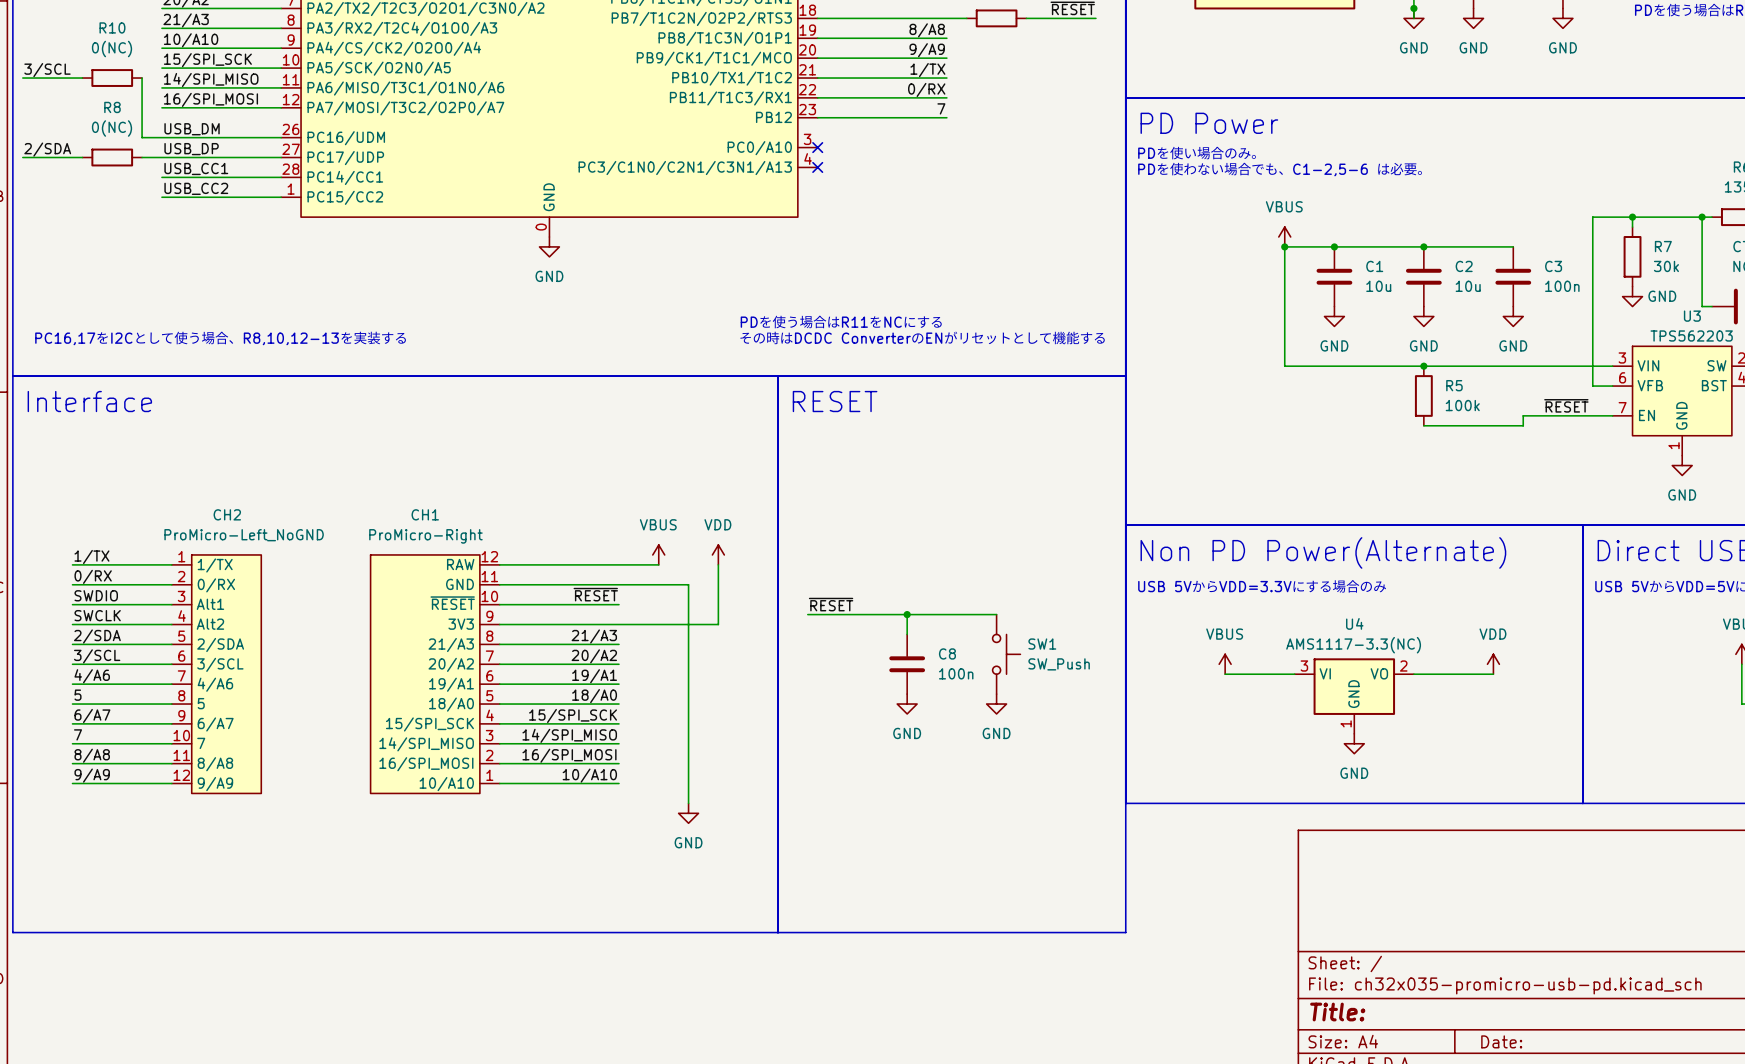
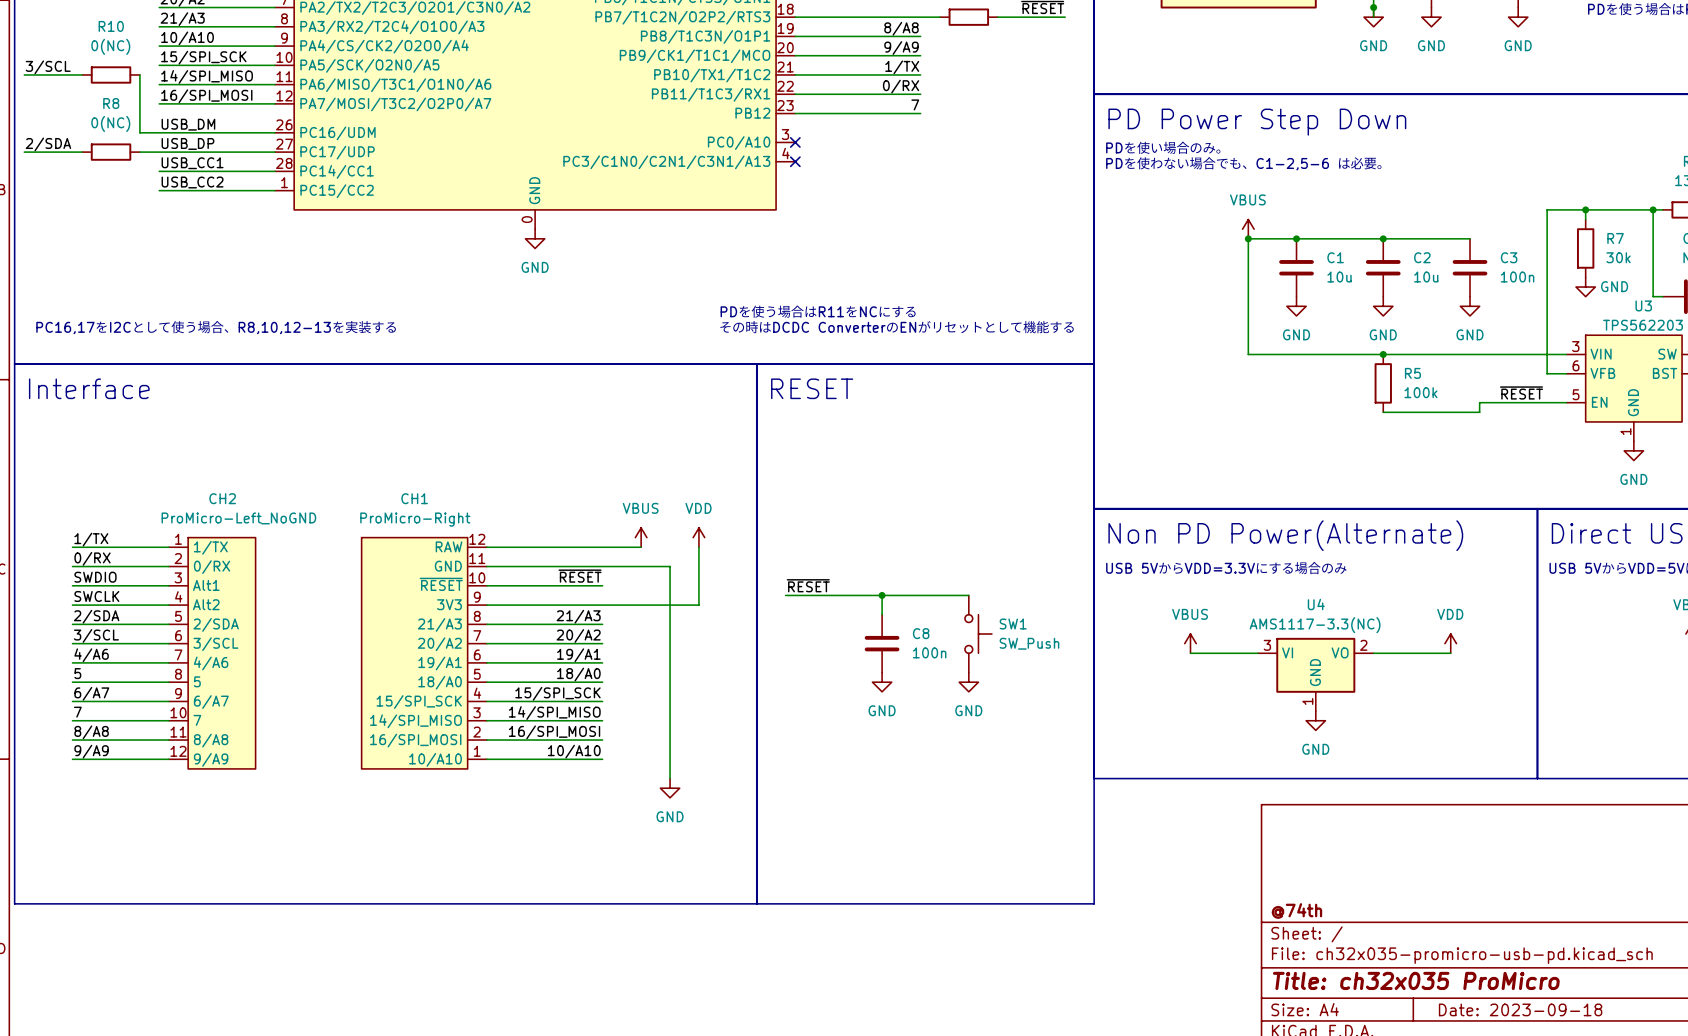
text: PD Power (1209, 123) -> PD Power Step Down (1257, 122)
U3 pin number: 7 (1622, 407) -> 5 (1576, 394)
title block: none -> @74th (1296, 911)
title block: Title: (1337, 1012) -> Title: ch32x035 ProMicro (1416, 980)
title block: Date: (1501, 1041) -> Date: 2023-09-18 (1520, 1009)

